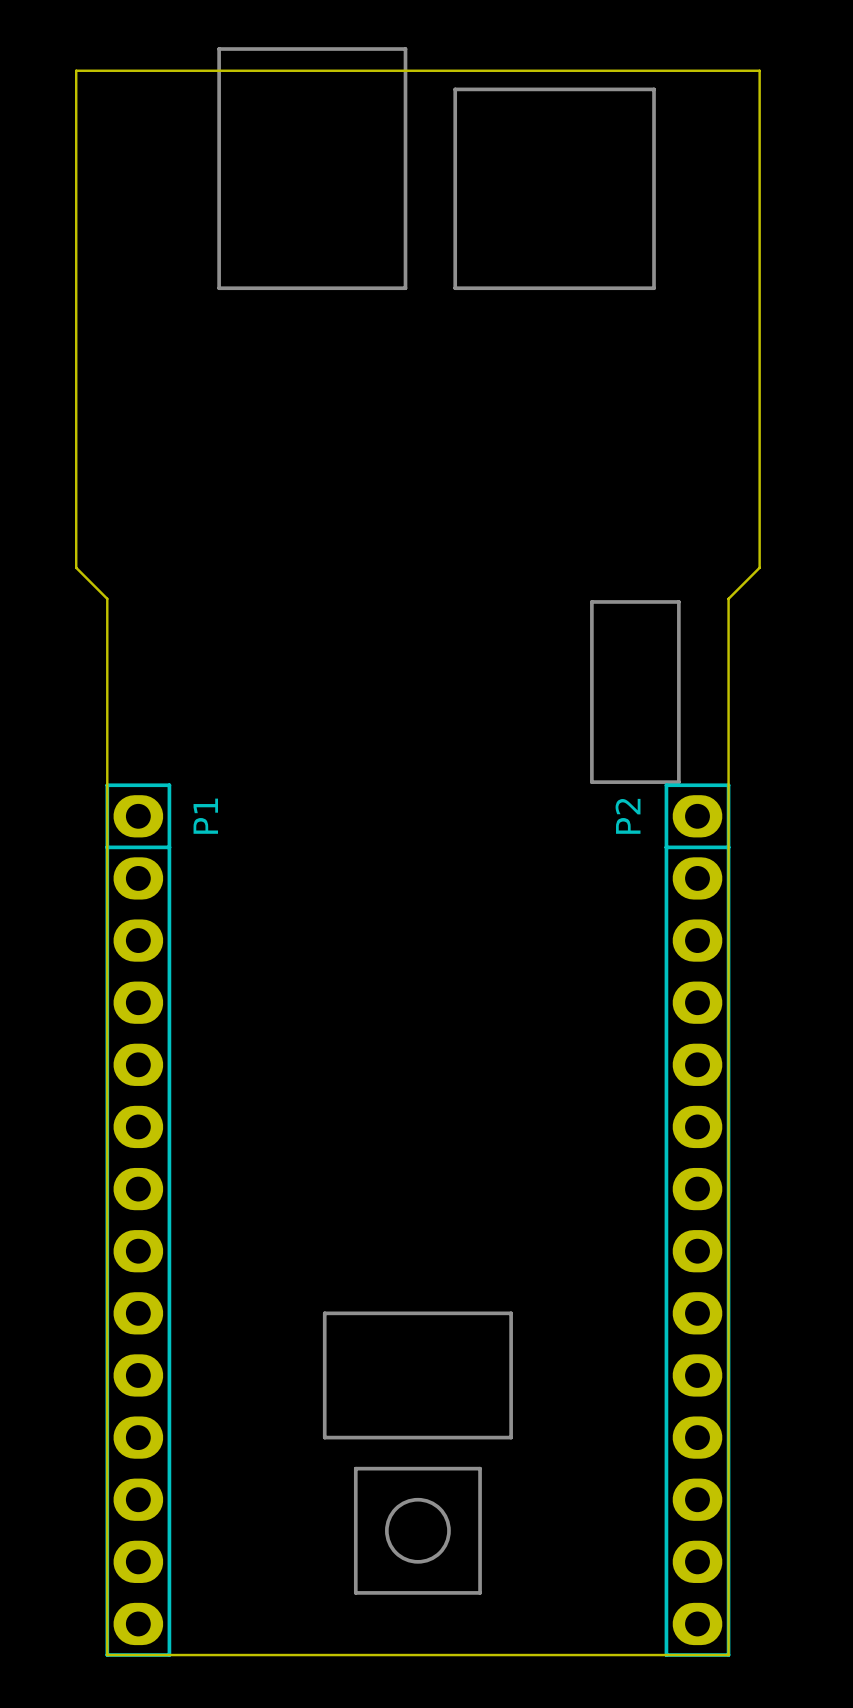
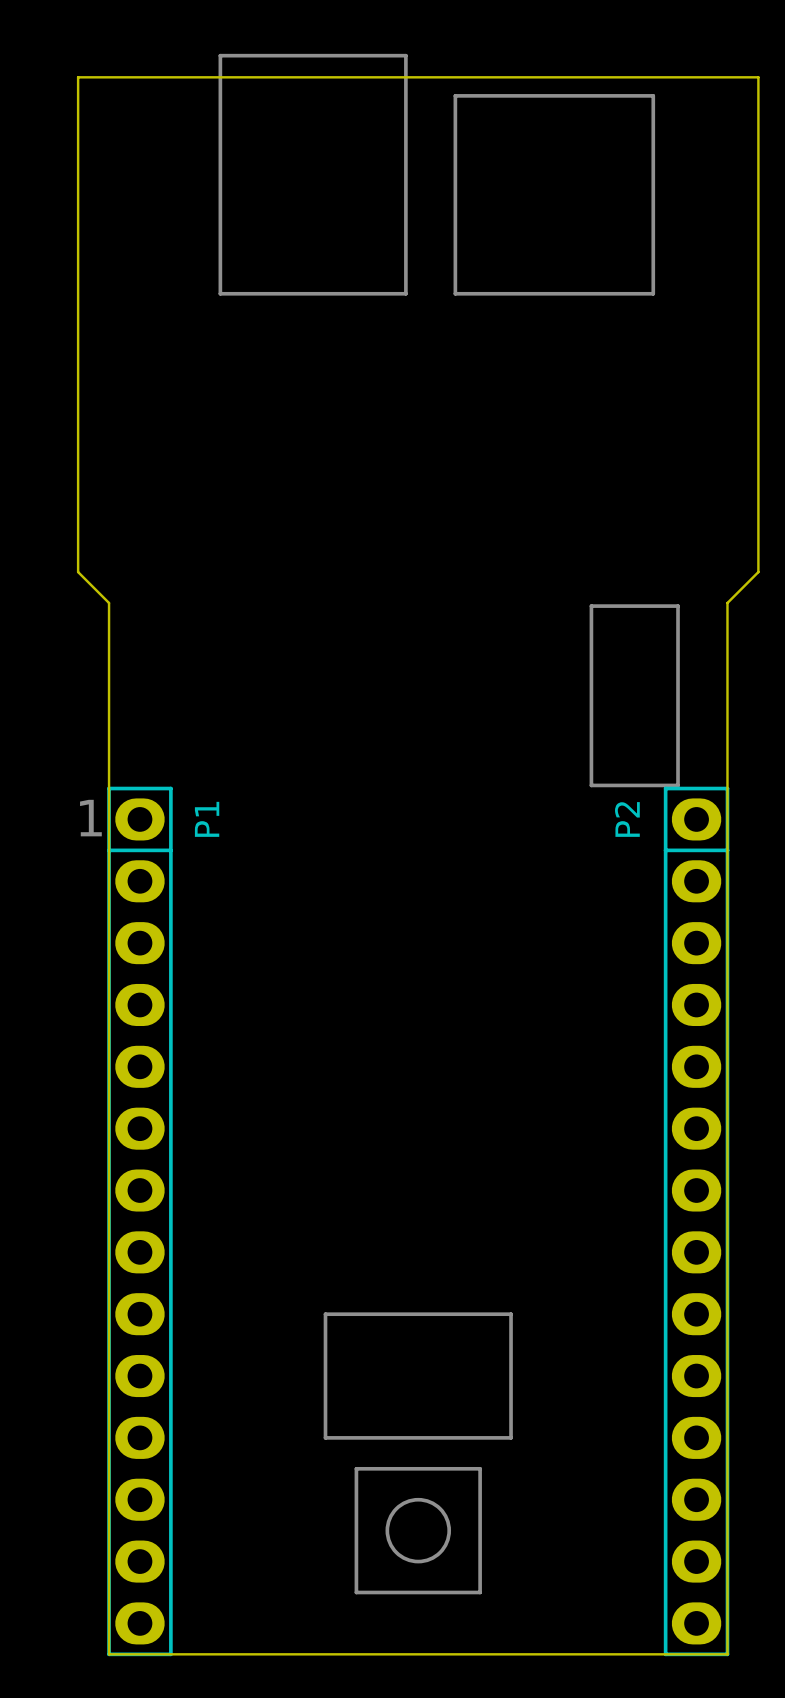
text: none -> 1 (90, 818)

